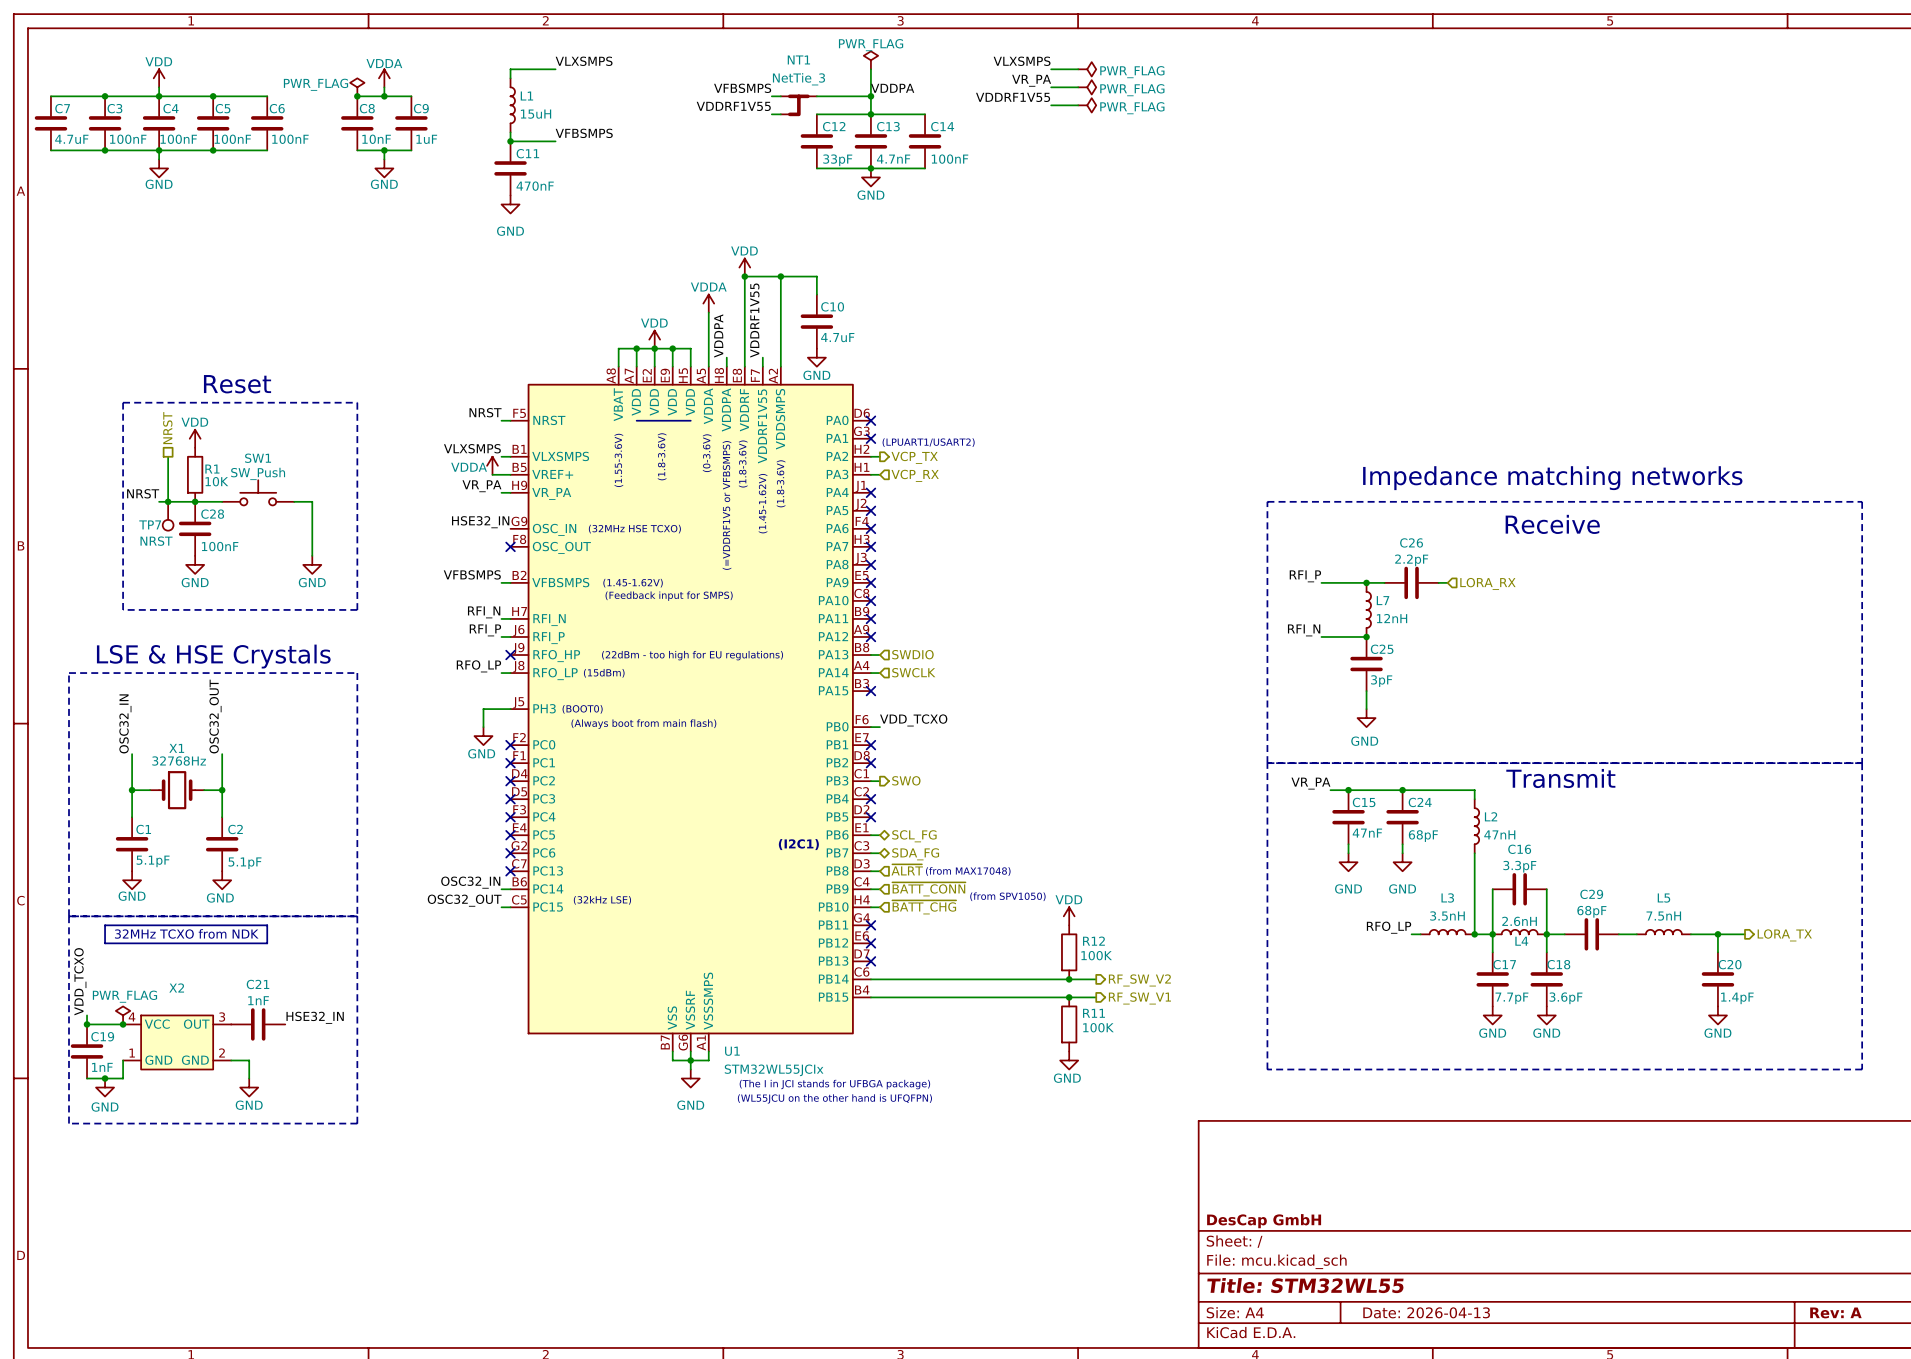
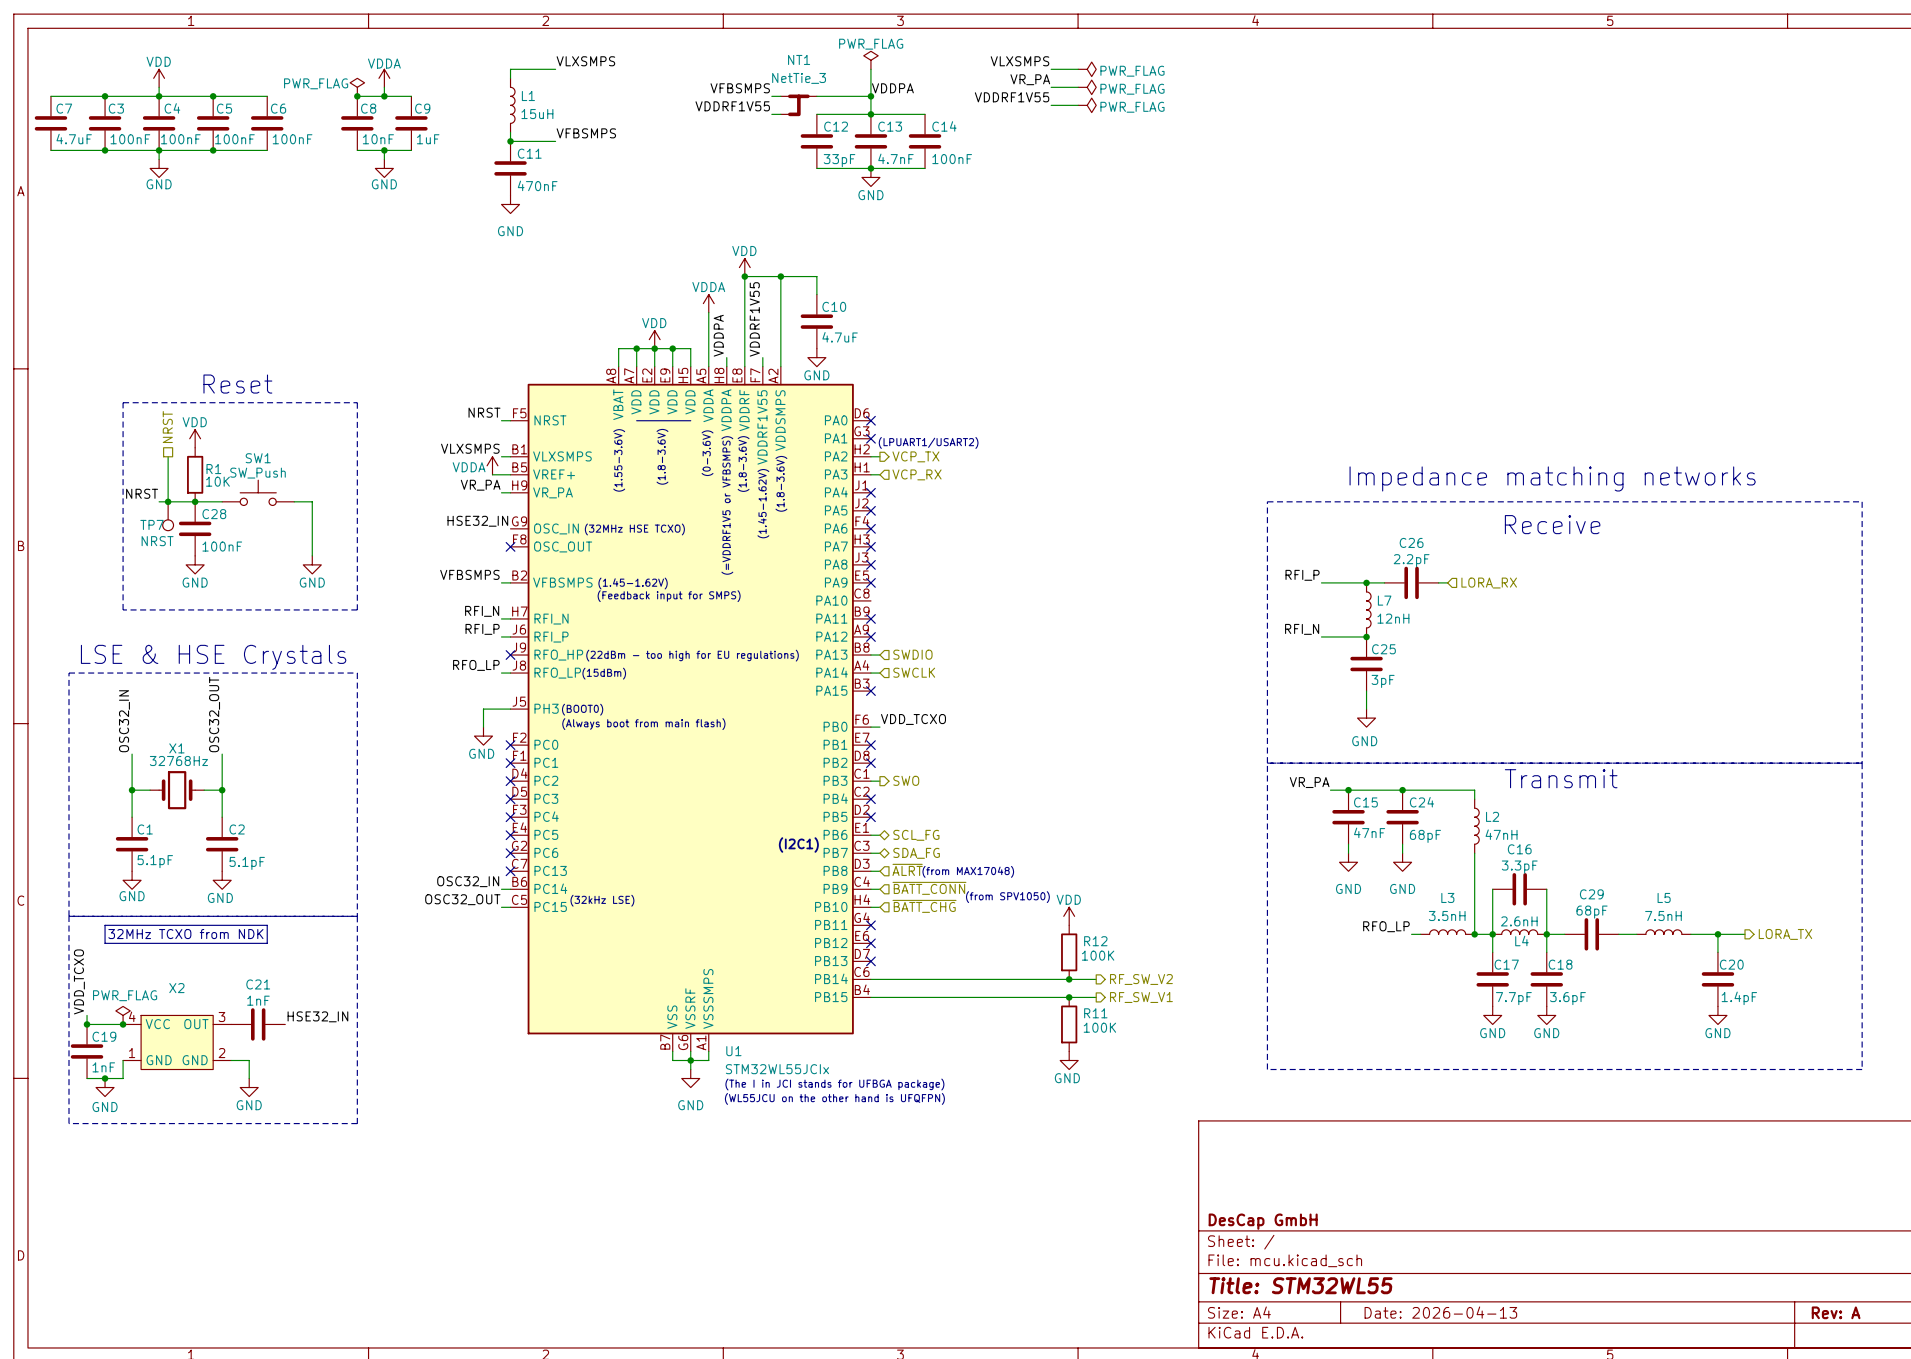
no-connect mark: (870, 600) -> none

